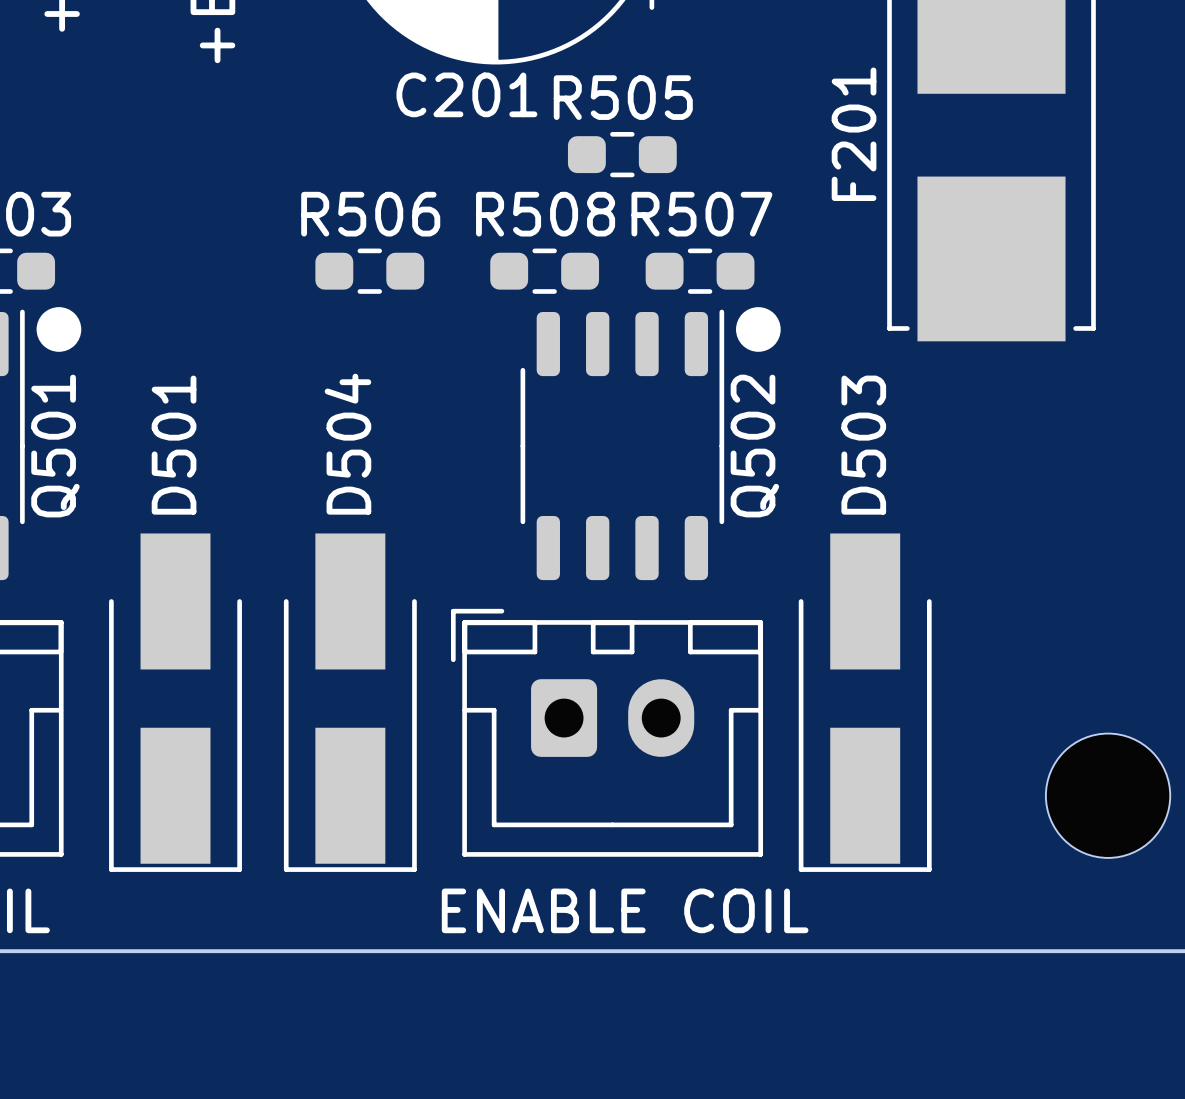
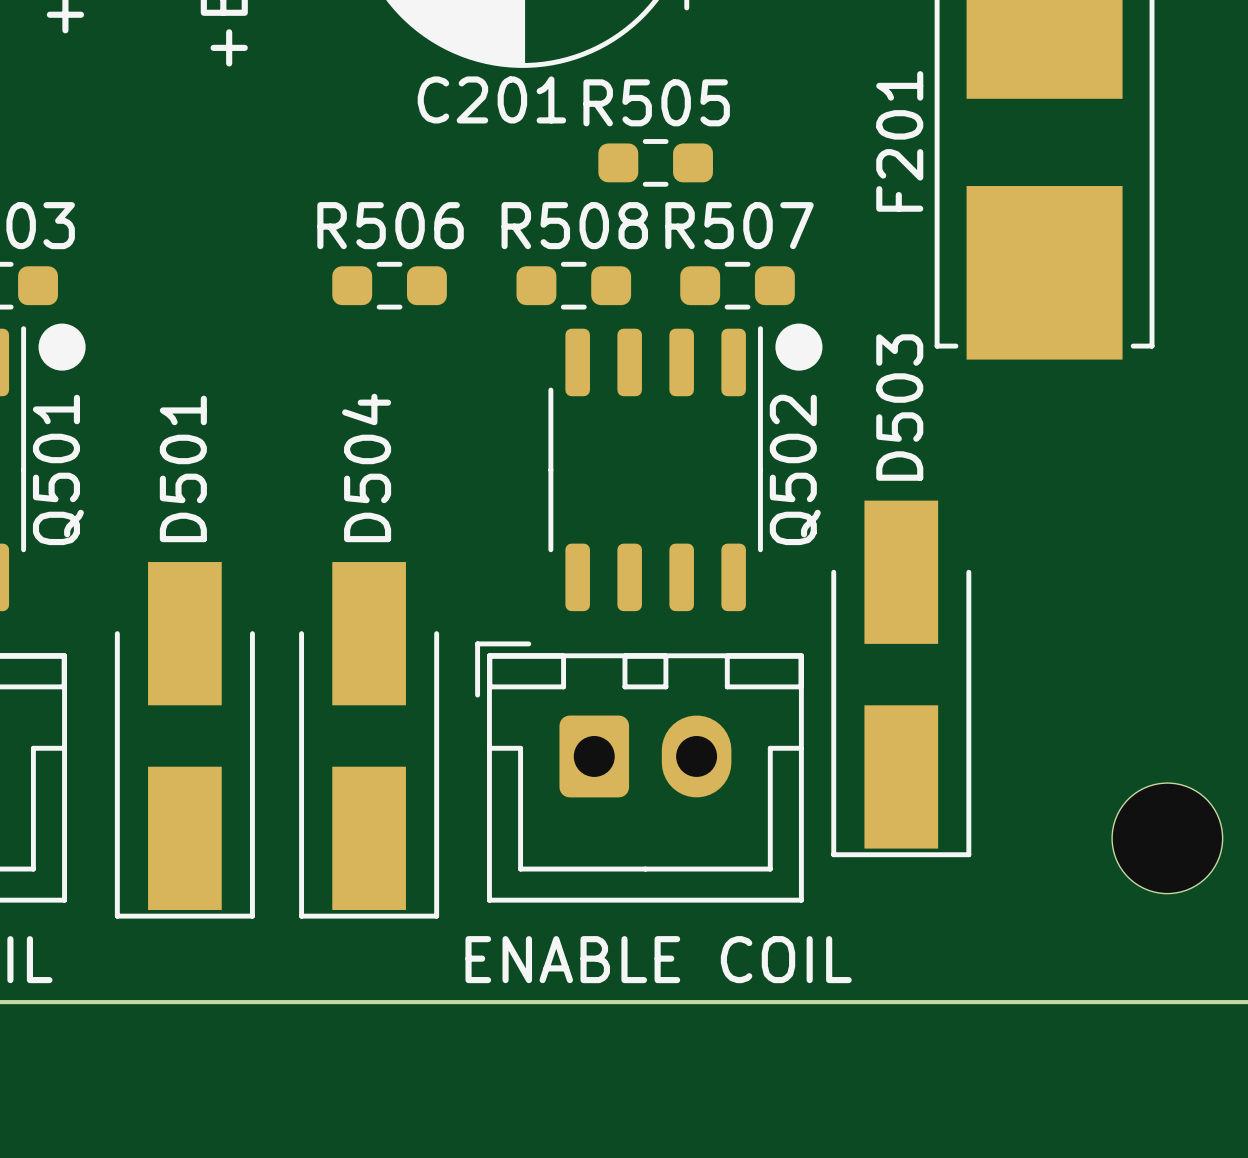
D503 position: (865, 702) -> (901, 678)
part footprint: [1045, 733, 1171, 858] -> [1112, 783, 1223, 894]

